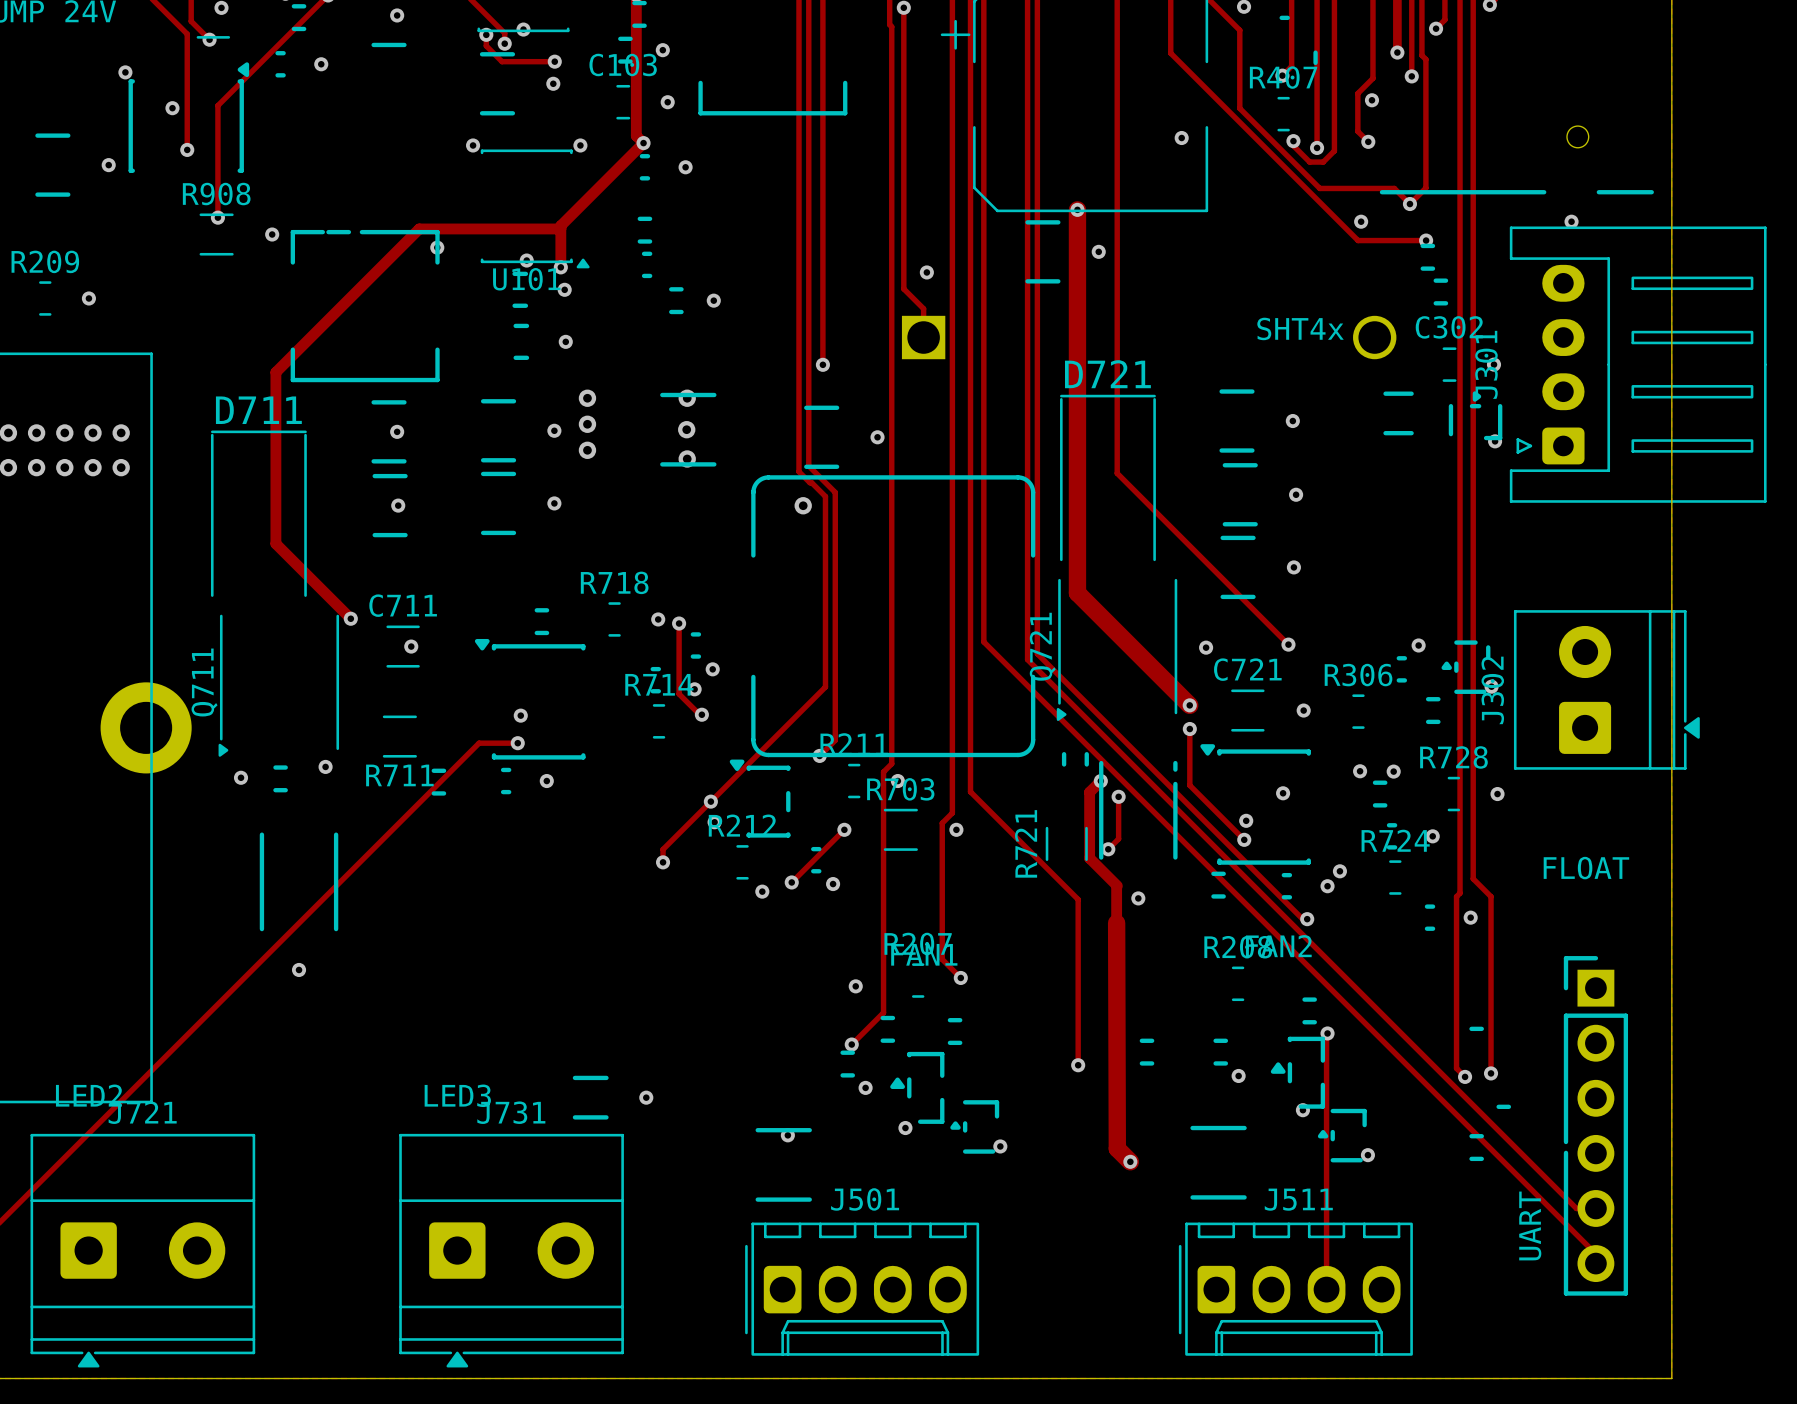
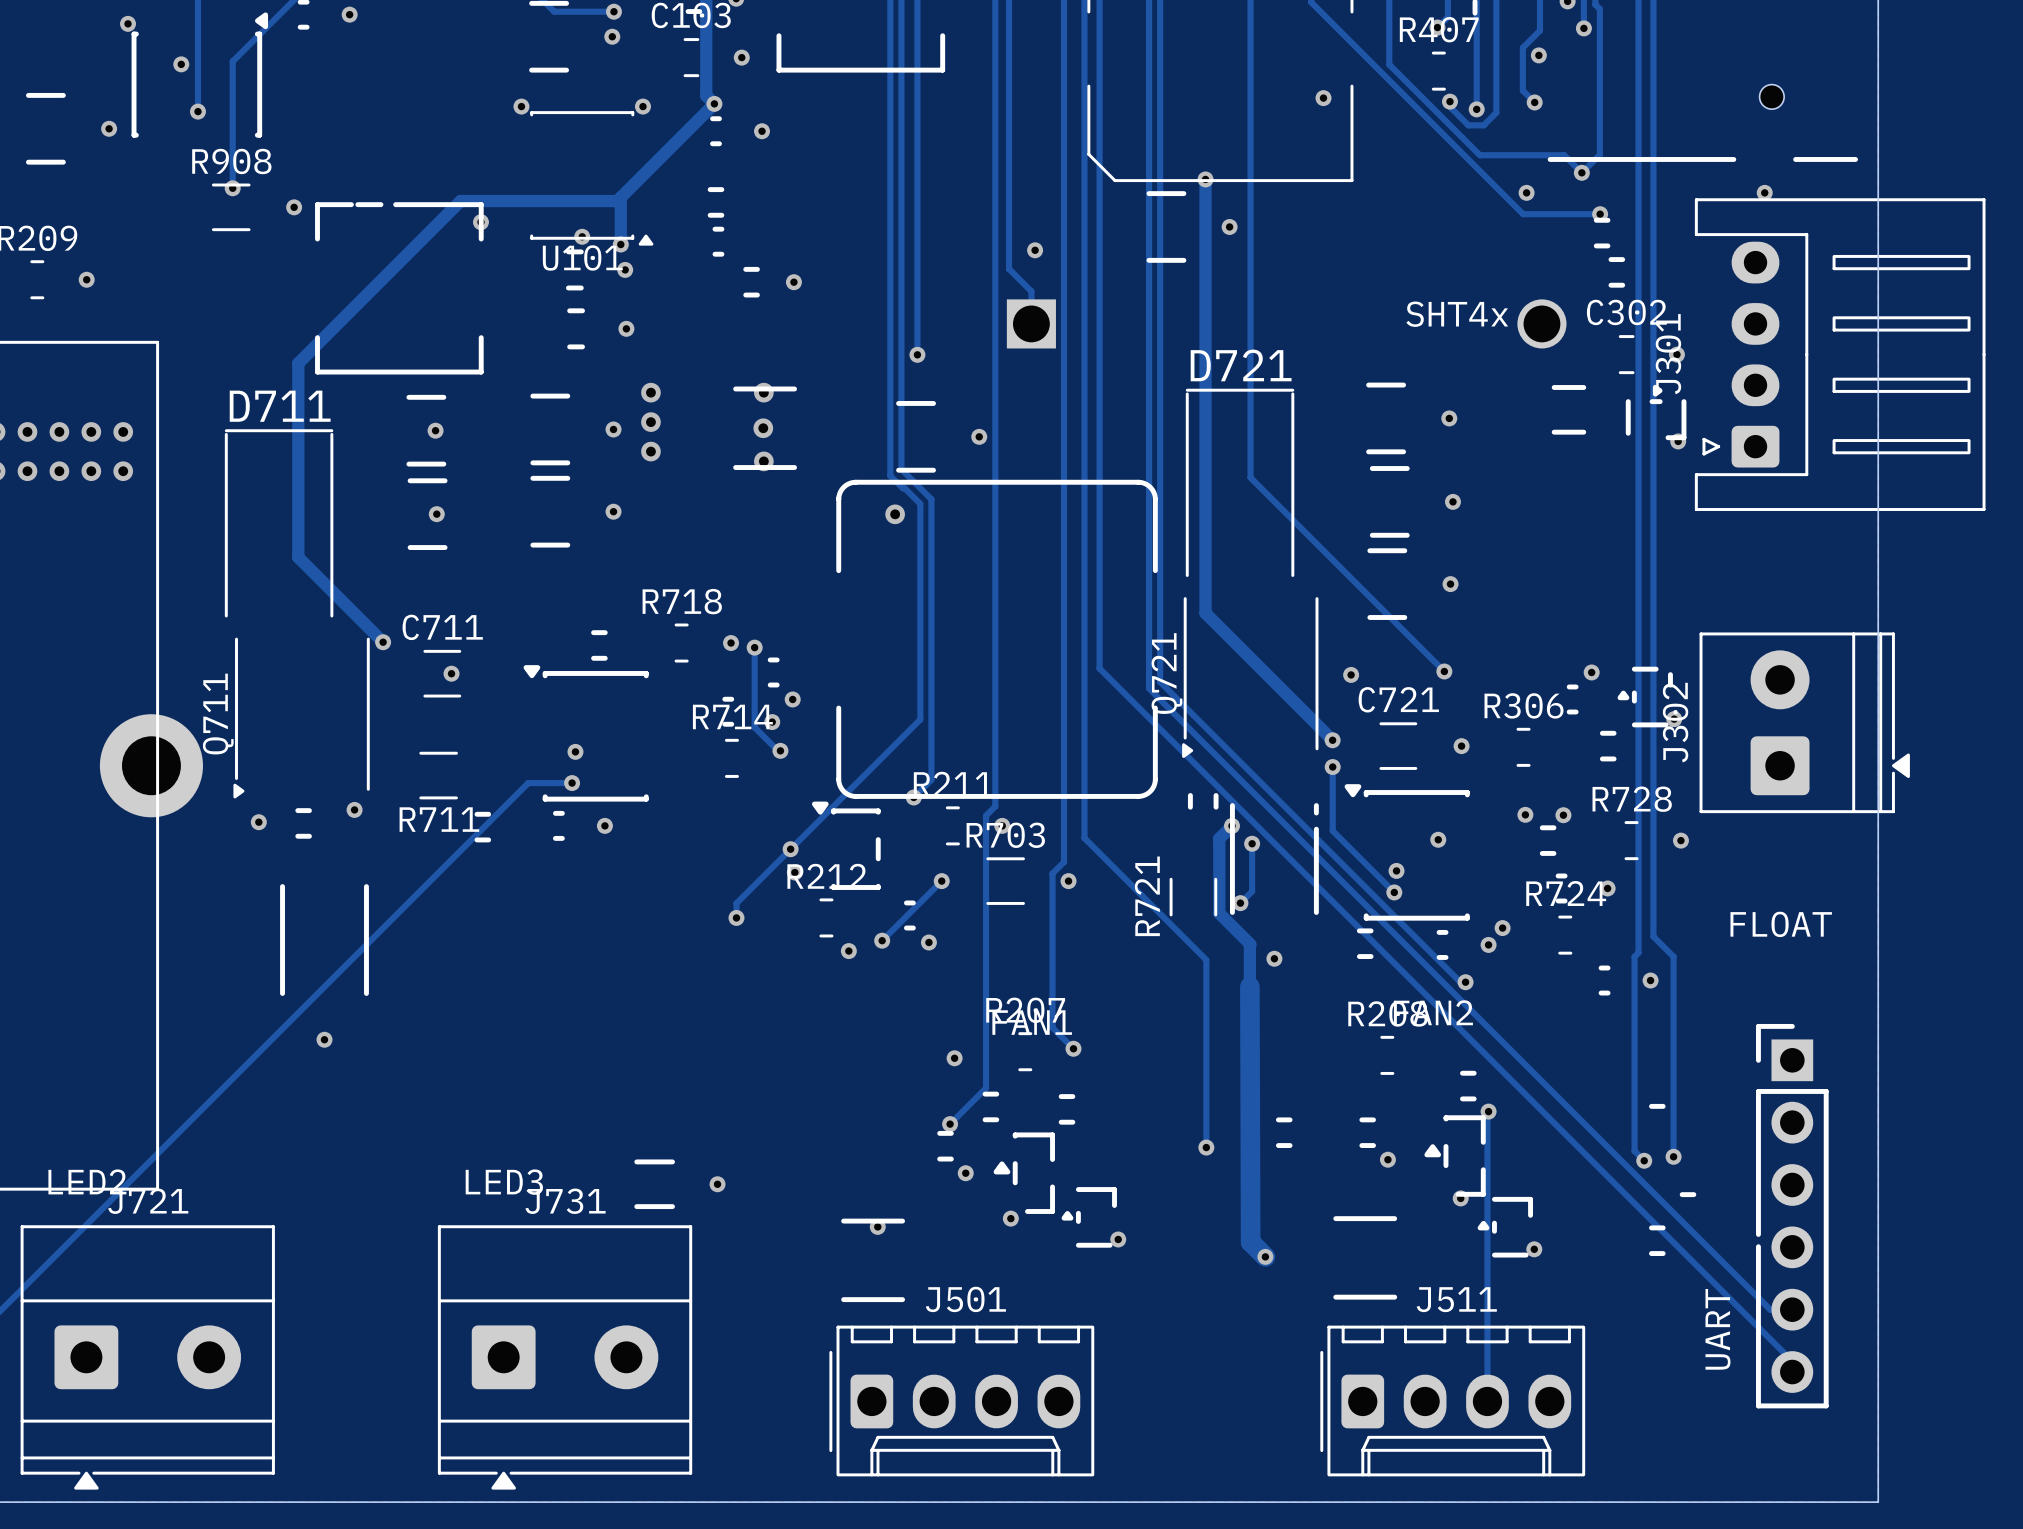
track width: thick (1077, 209) (1077, 593) (1189, 705) -> thin (1205, 179) (1205, 613) (1332, 740)

